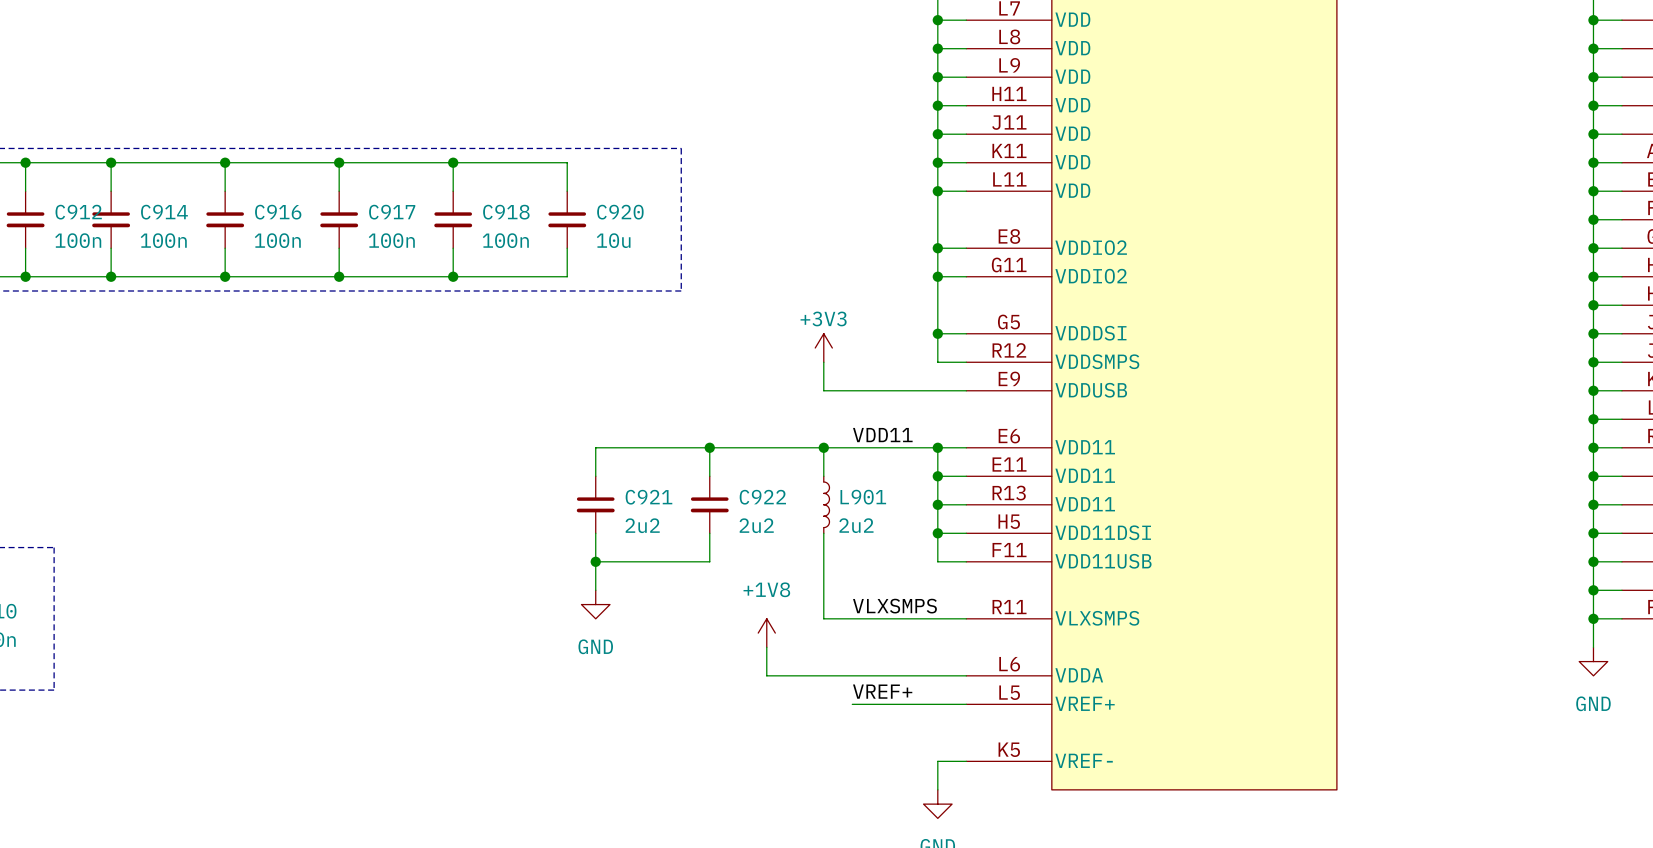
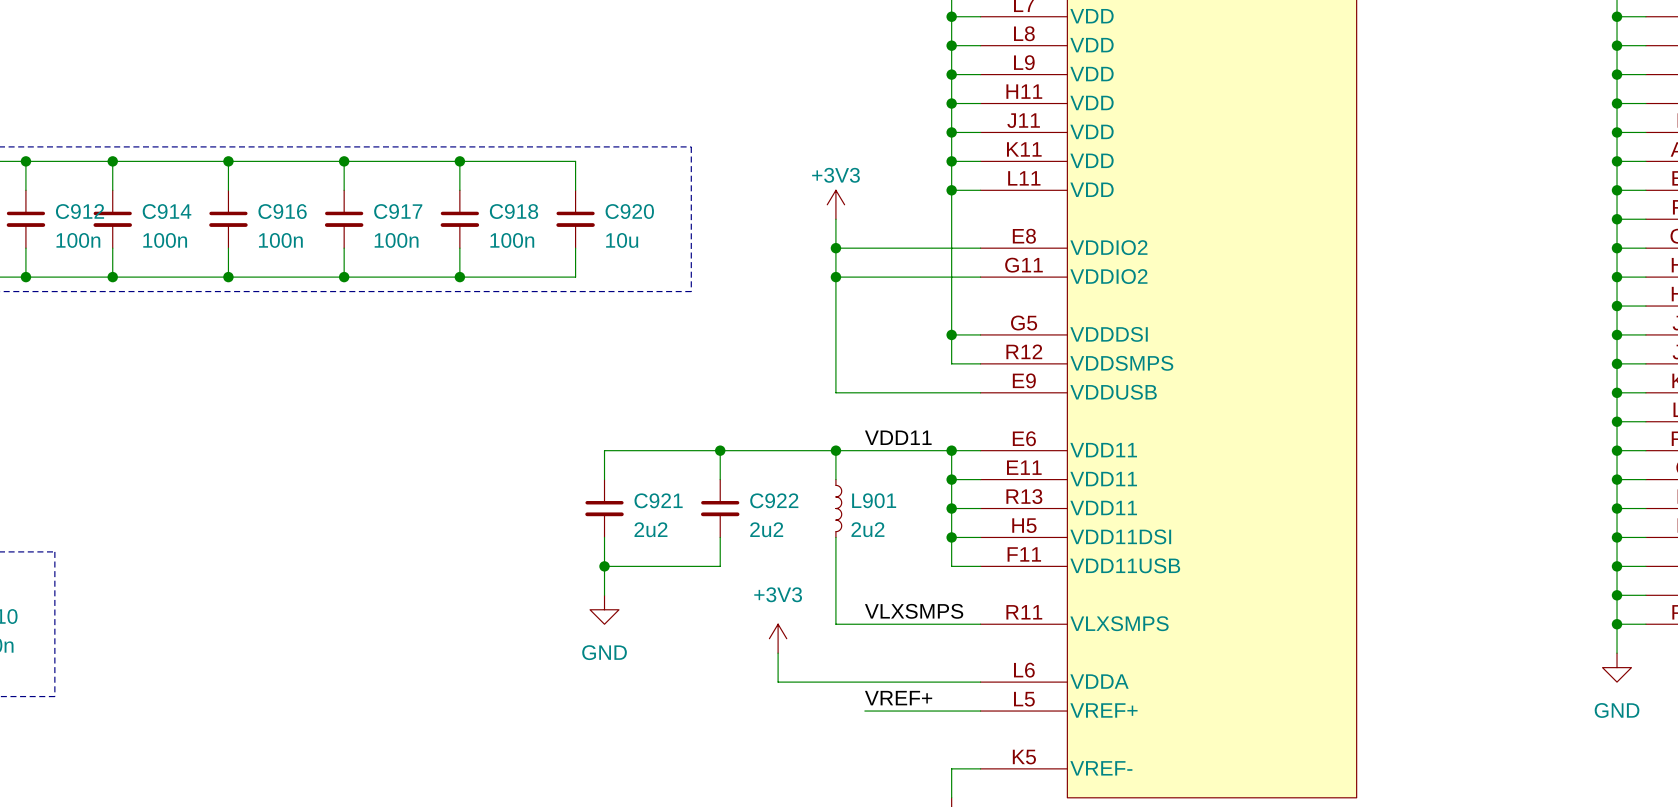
wire: none -> (835, 219) (835, 363)
wire: none -> (835, 248) (951, 248)
junction: none -> (835, 248)
junction: (937, 248) -> none
wire: none -> (835, 277) (951, 277)
junction: none -> (835, 277)
junction: (937, 276) -> none
power symbol position: +3V3 (823, 348) -> +3V3 (835, 204)
power symbol: +1V8 (766, 633) -> +3V3 (778, 638)

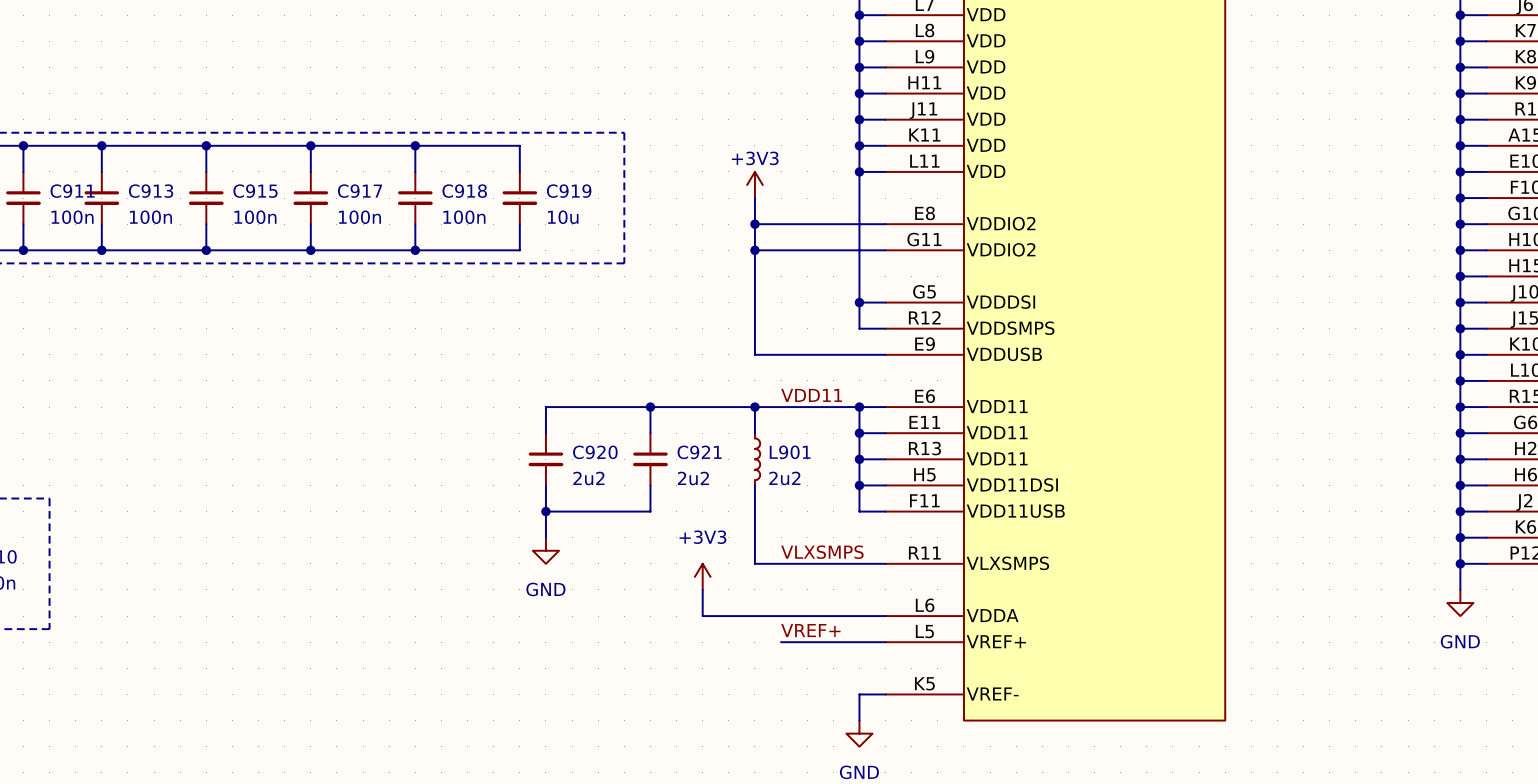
C912 name: C912 (80, 211) -> C911 (72, 191)
C914 name: C914 (167, 211) -> C913 (151, 191)
C916 name: C916 (282, 211) -> C915 (255, 191)
C920 name: C920 (629, 211) -> C919 (569, 191)
C921 name: C921 (658, 500) -> C920 (595, 452)
C922 name: C922 (774, 500) -> C921 (699, 452)

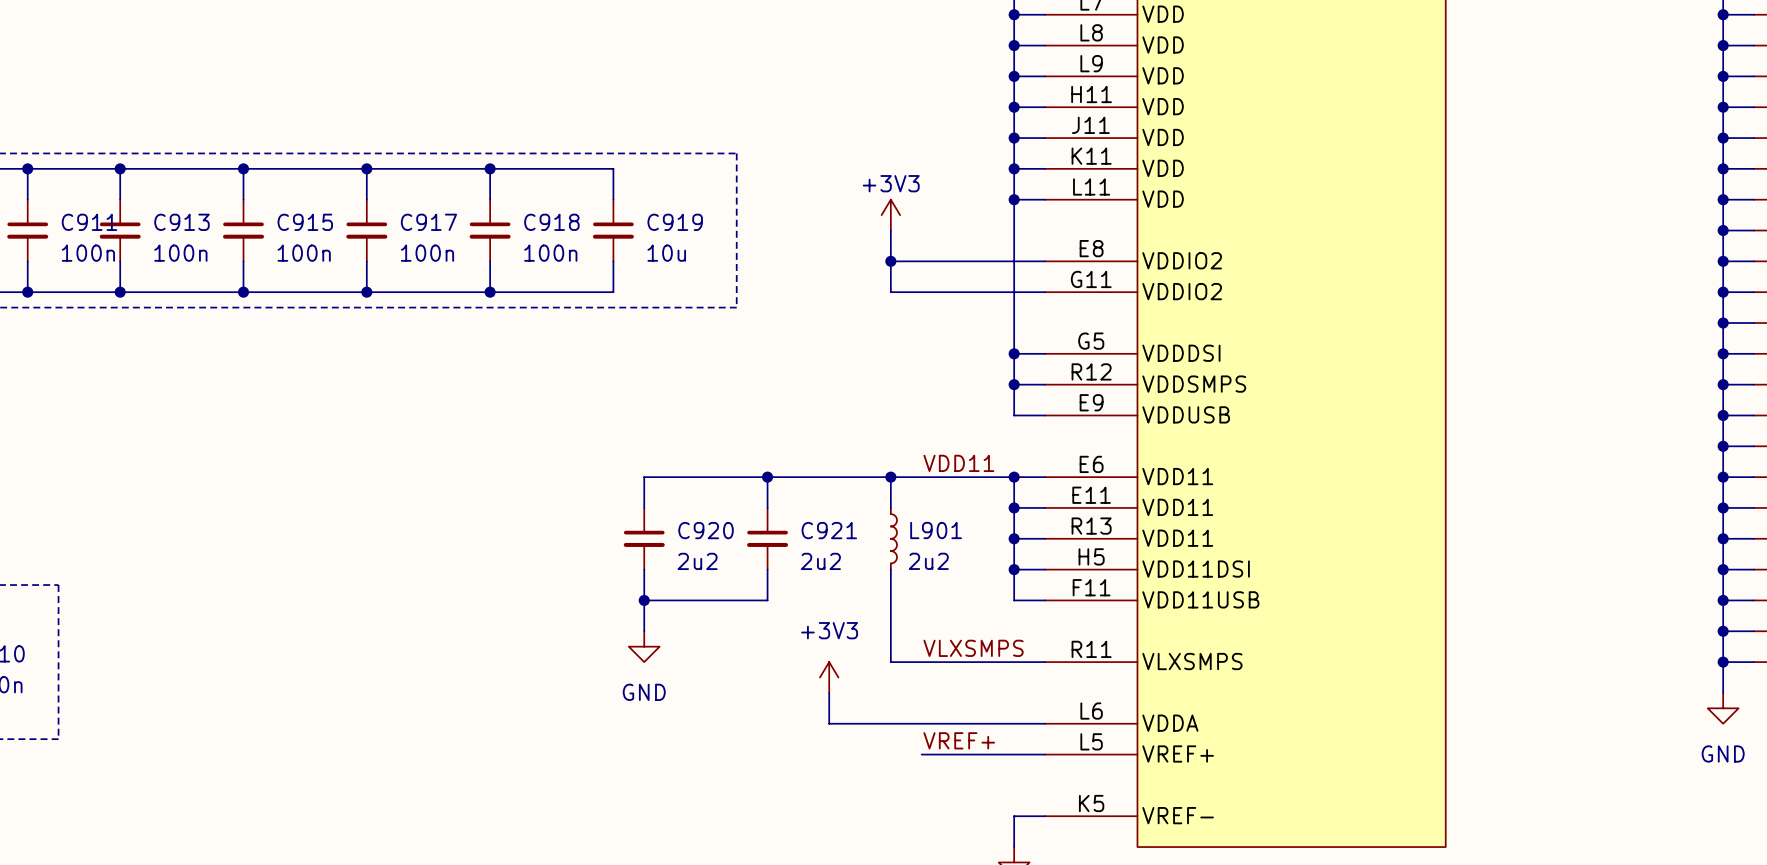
wire: (754, 250) (754, 354) (859, 354) -> (1014, 384) (1014, 415)
junction: (754, 250) -> none
junction: none -> (1014, 384)

